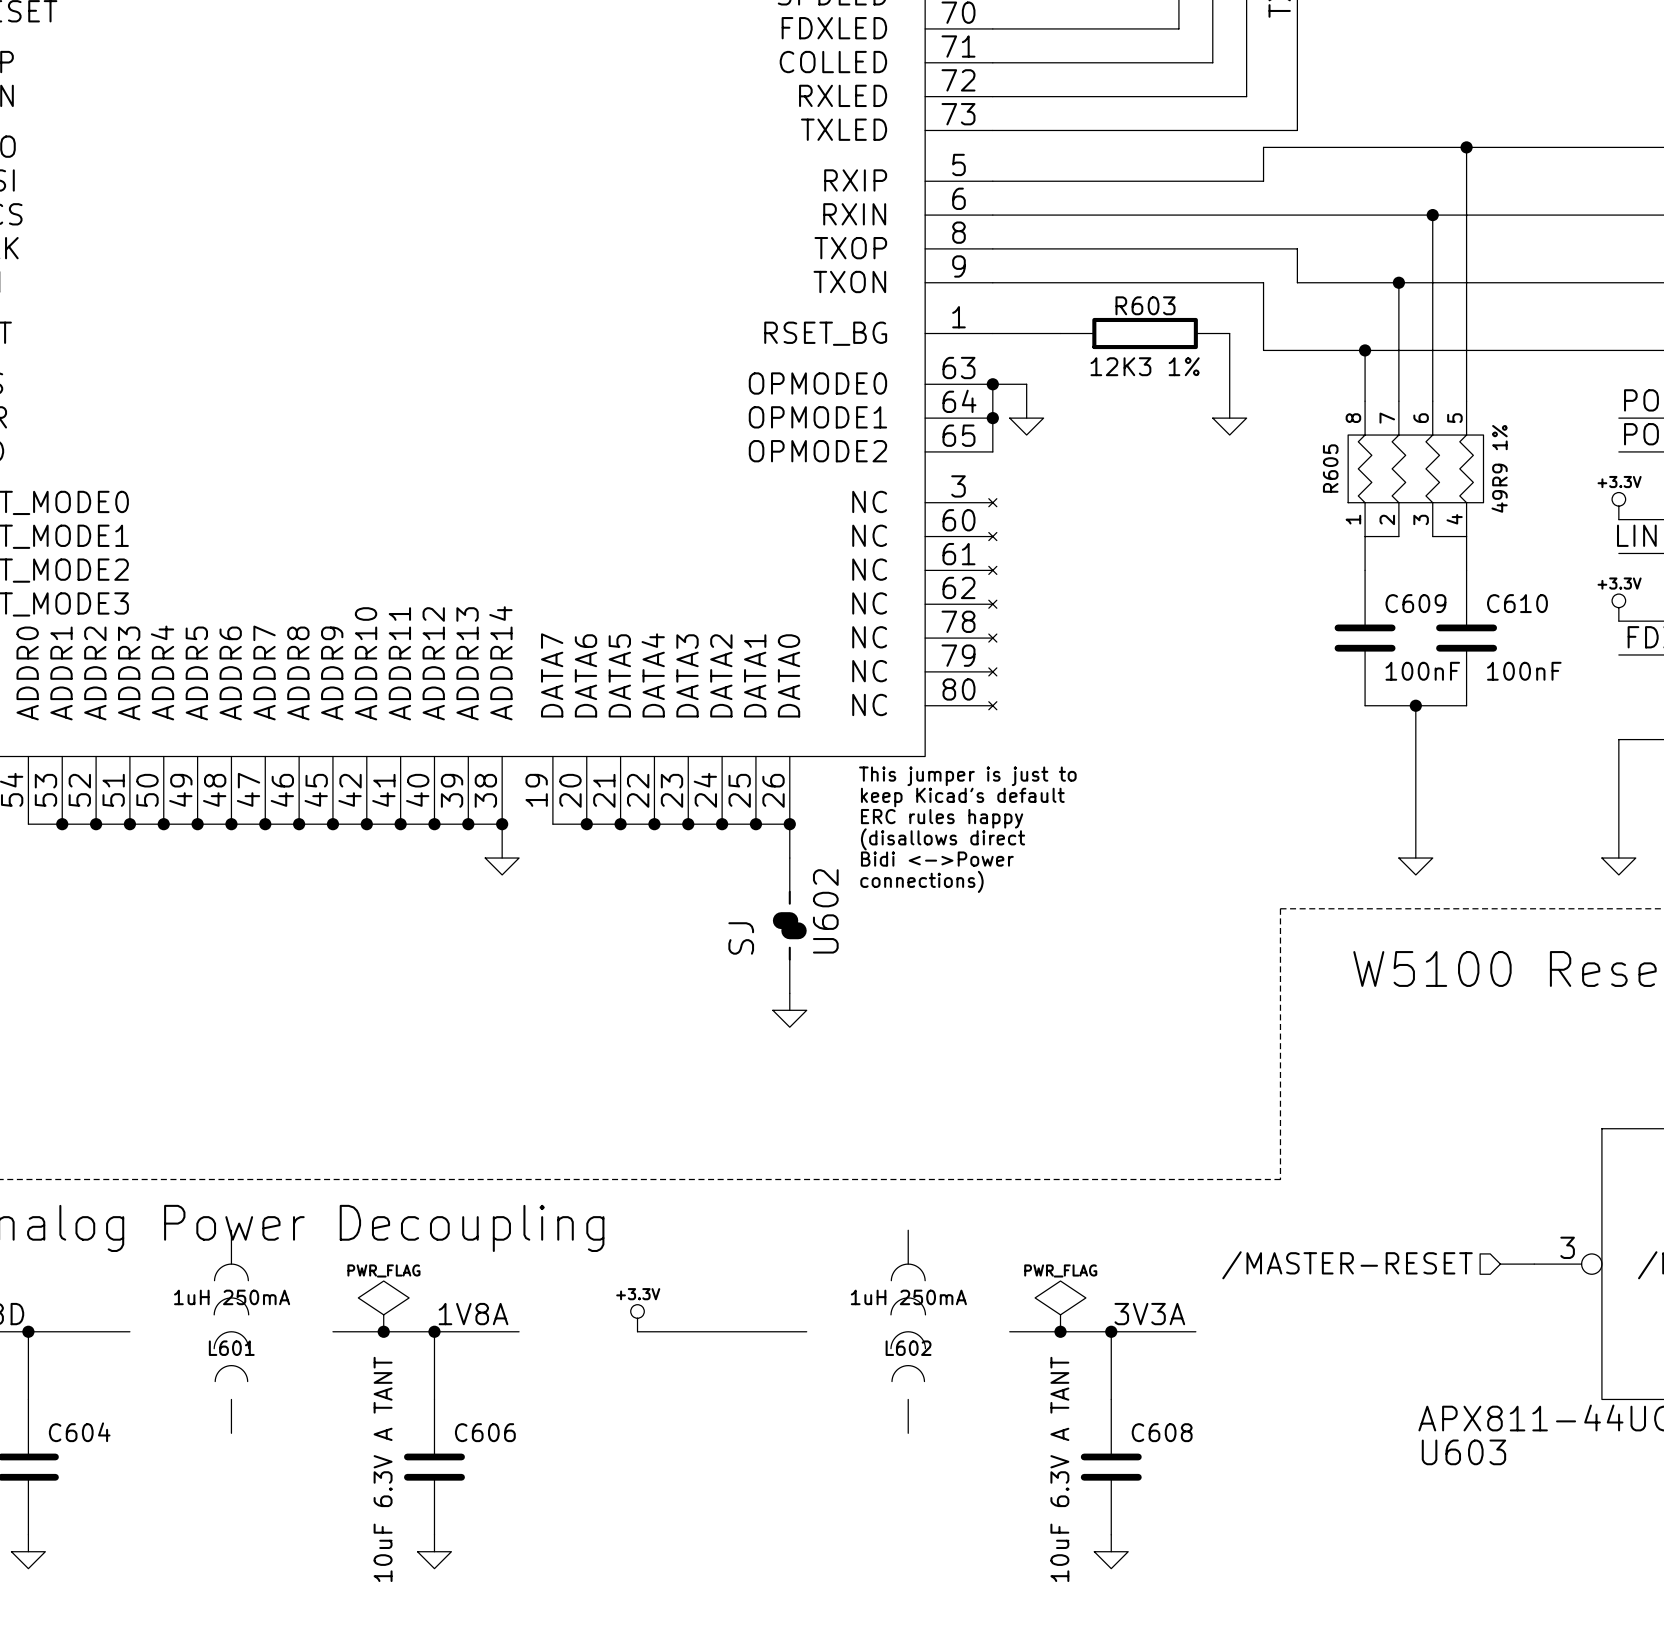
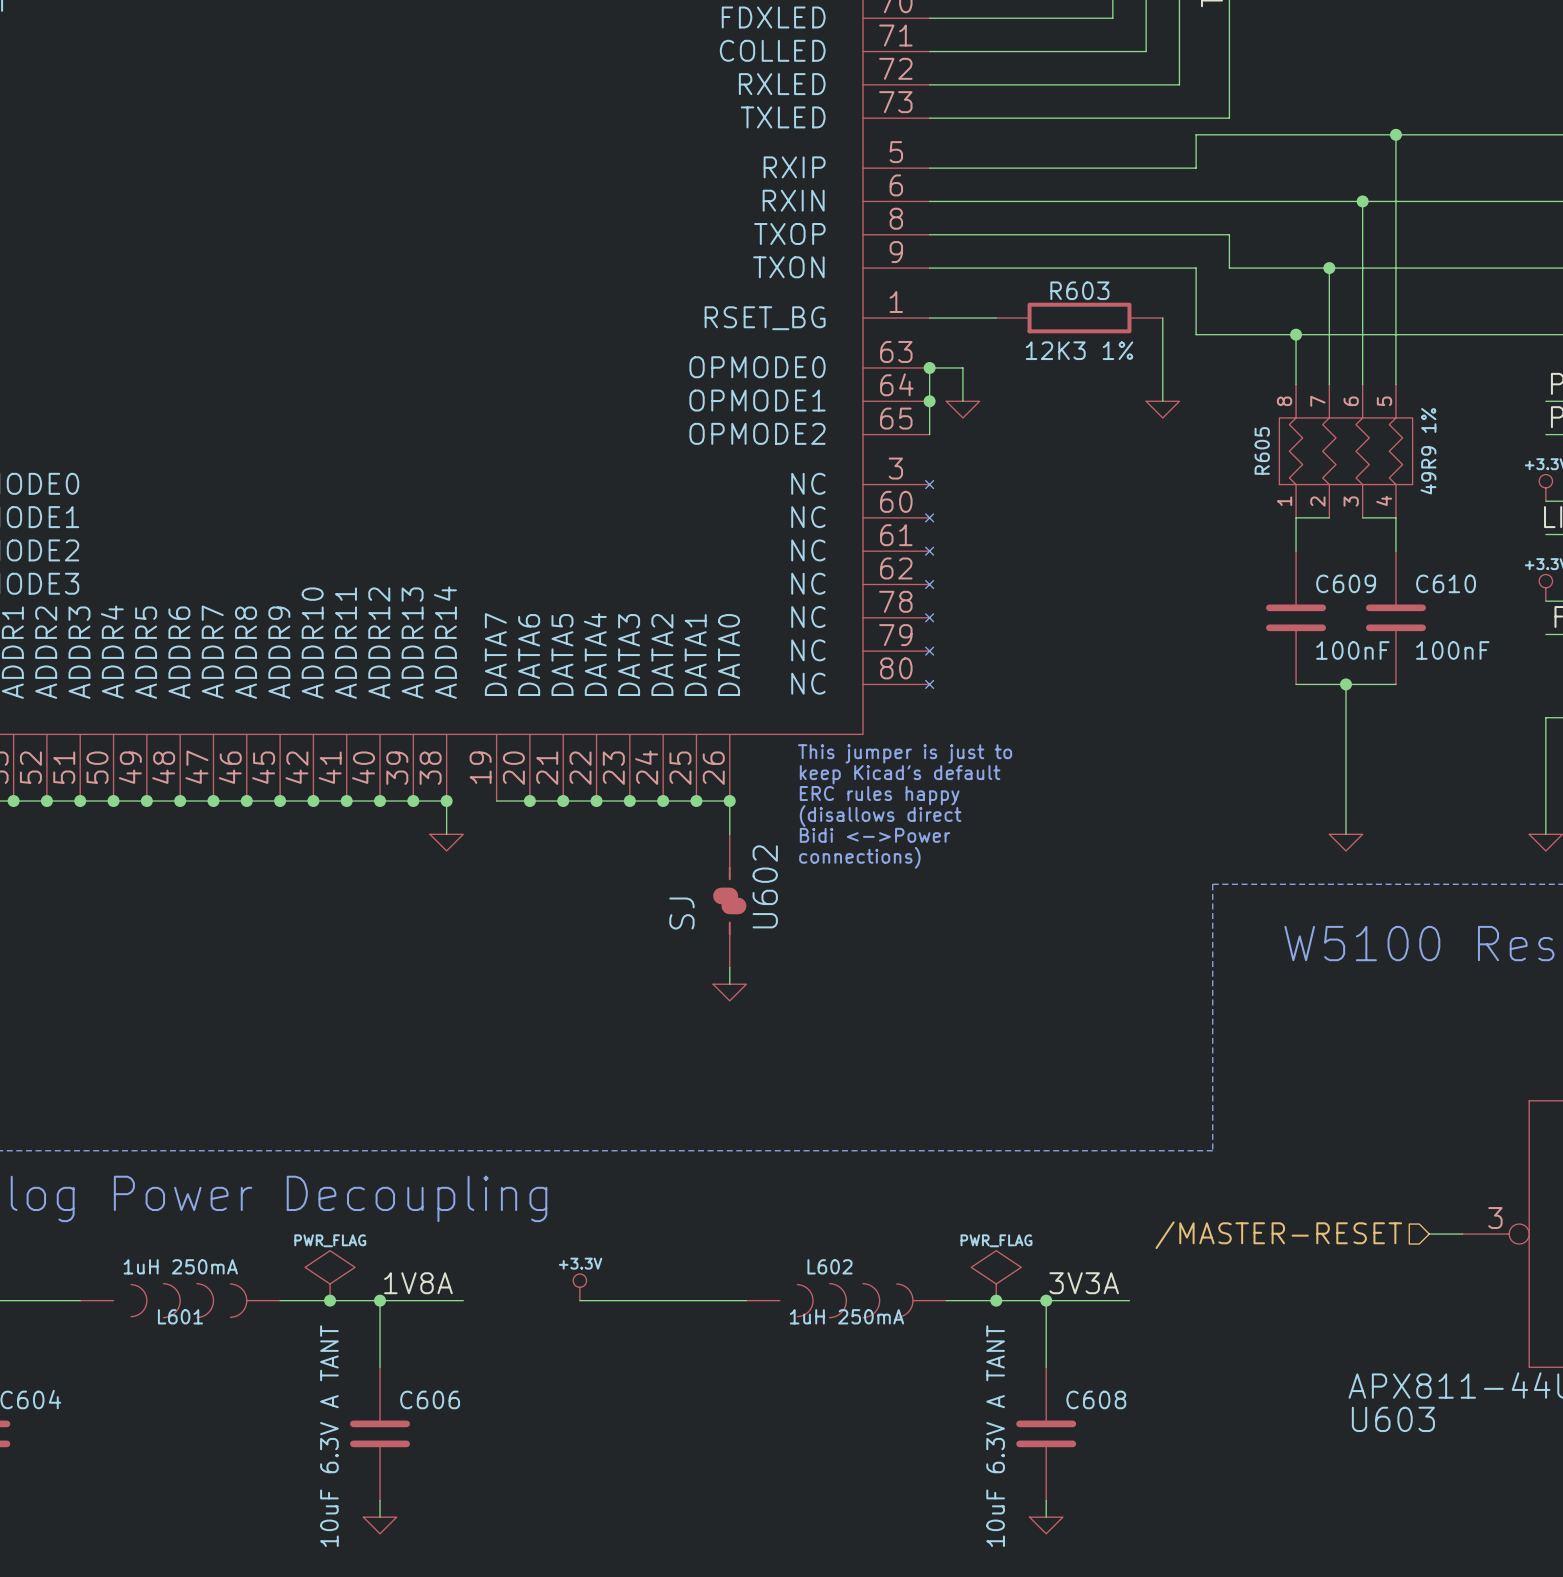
L602 value position: 1uH 250mA (908, 1297) -> 1uH 250mA (846, 1316)
L601 rotation: 0° (231, 1322) -> 90° clockwise (188, 1300)
L602 rotation: 0° (908, 1322) -> 90° clockwise (855, 1300)
L602 name position: L602 (908, 1348) -> L602 (830, 1266)

